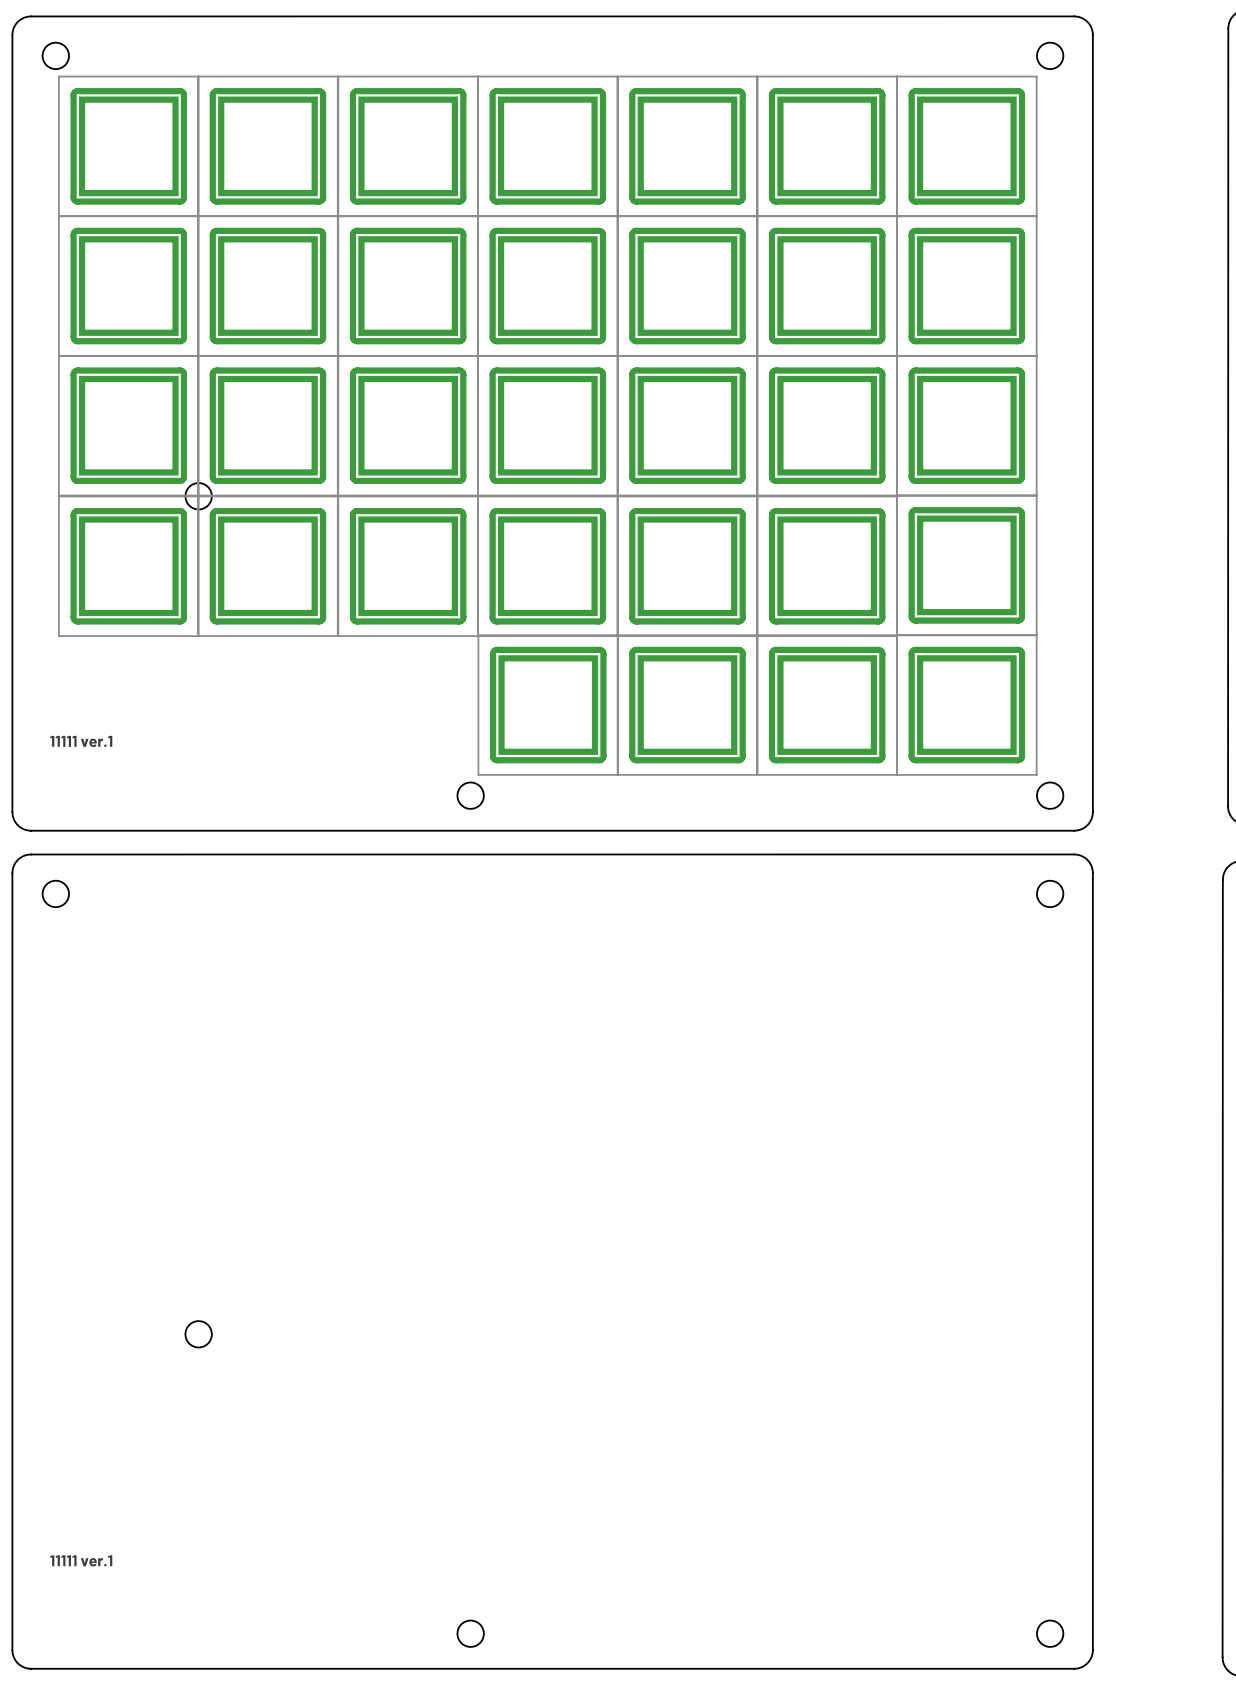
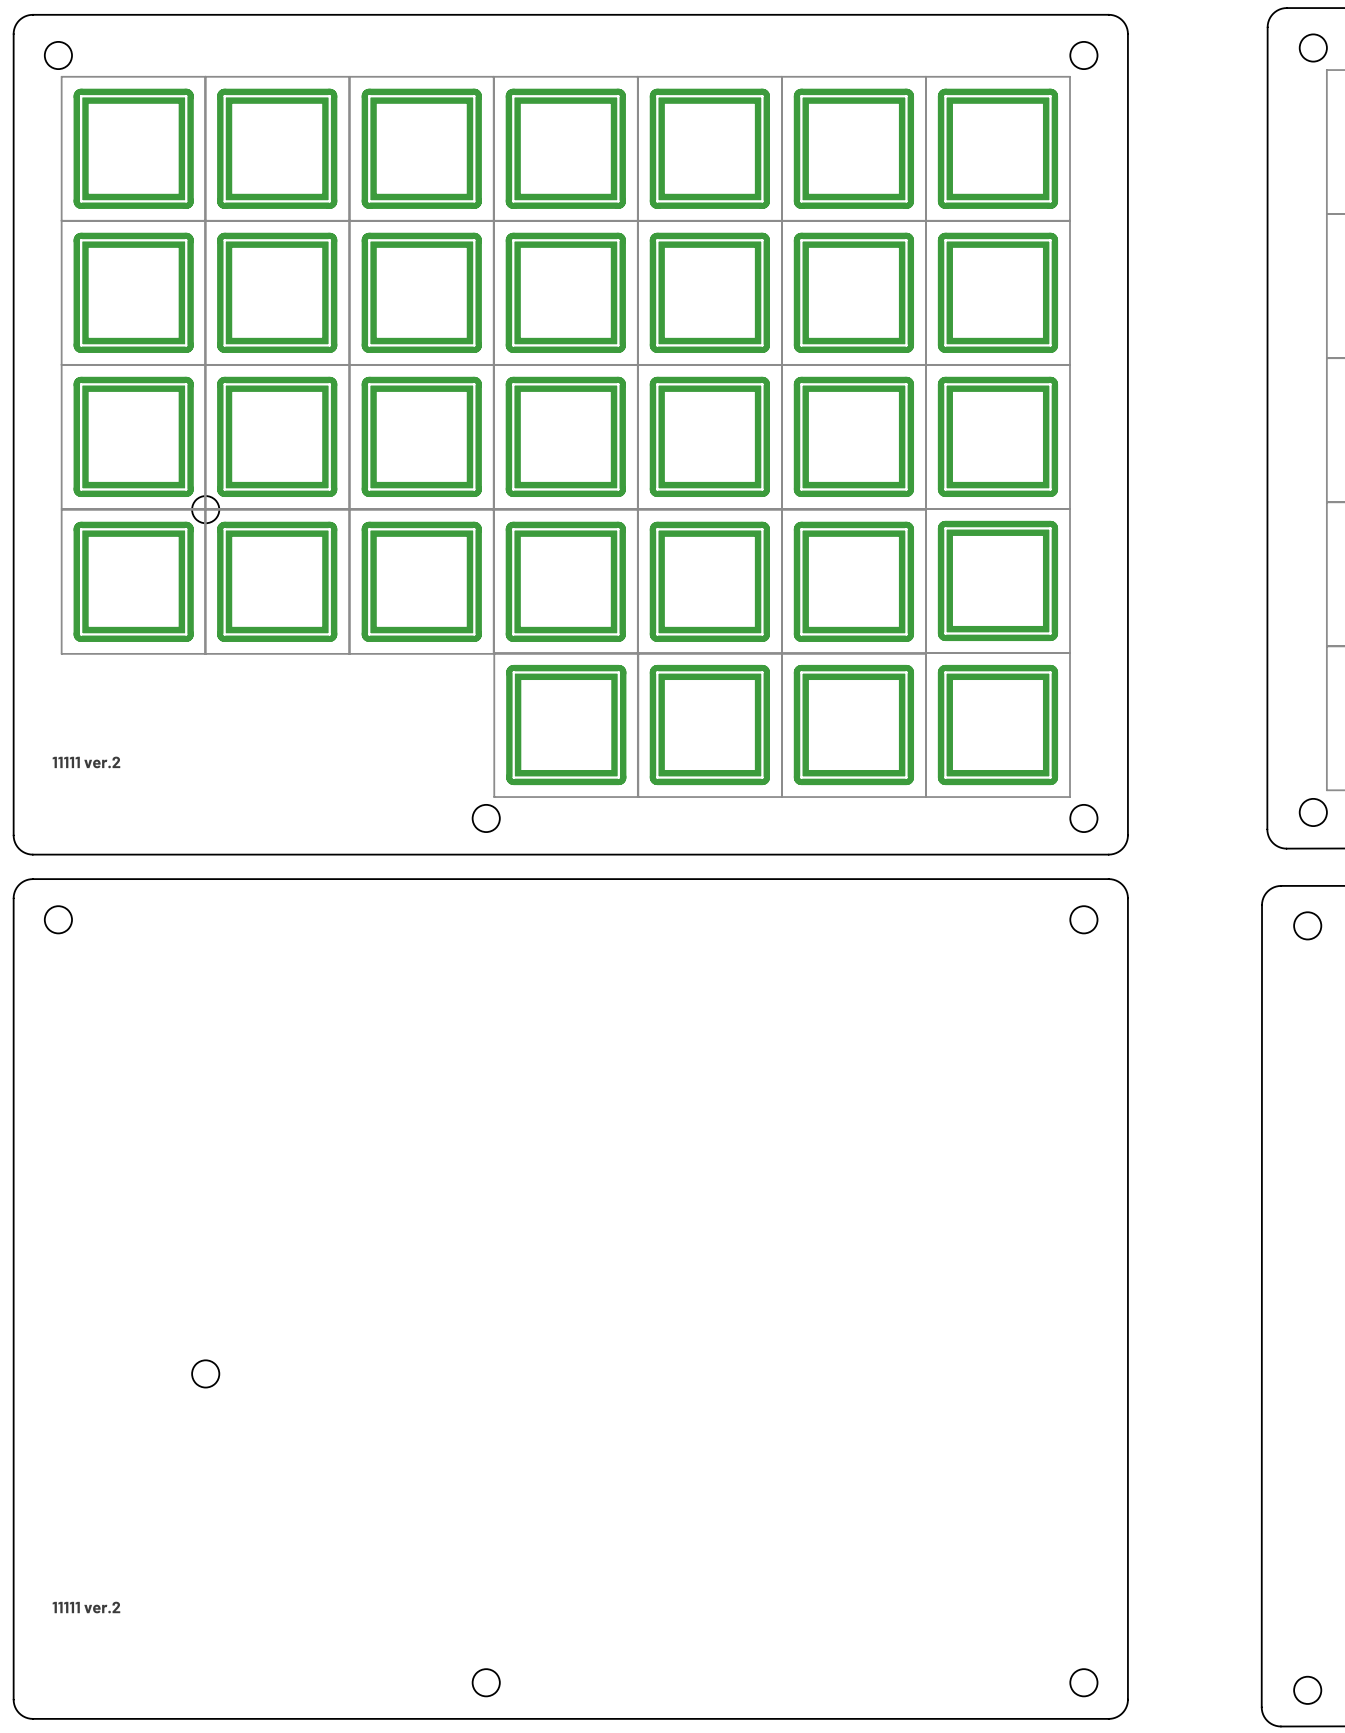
text: 11111 ver.1 (81, 741) -> 11111 ver.2 (86, 762)
text: 11111 ver.1 (81, 1560) -> 11111 ver.2 (86, 1607)

